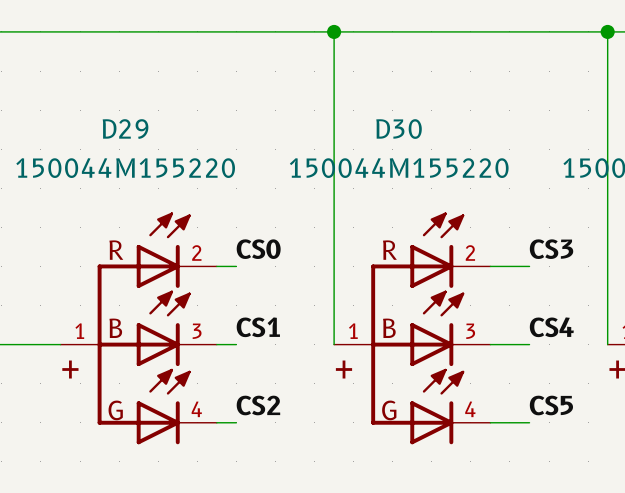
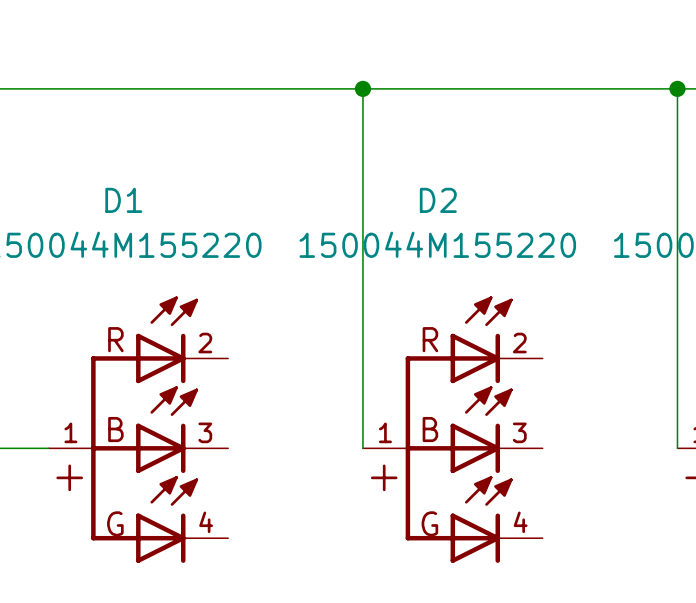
D29 name: D29 (125, 129) -> D1 (123, 200)
D30 name: D30 (399, 129) -> D2 (438, 200)
label: CS0 (258, 249) -> none
label: CS3 (551, 249) -> none
wire: (216, 266) (236, 266) -> none
wire: (490, 266) (529, 266) -> none
label: CS1 (258, 327) -> none
label: CS4 (551, 327) -> none
wire: (216, 344) (236, 344) -> none
wire: (490, 344) (529, 344) -> none
label: CS2 (258, 405) -> none
label: CS5 (551, 405) -> none
wire: (216, 422) (236, 422) -> none
wire: (490, 422) (529, 422) -> none

